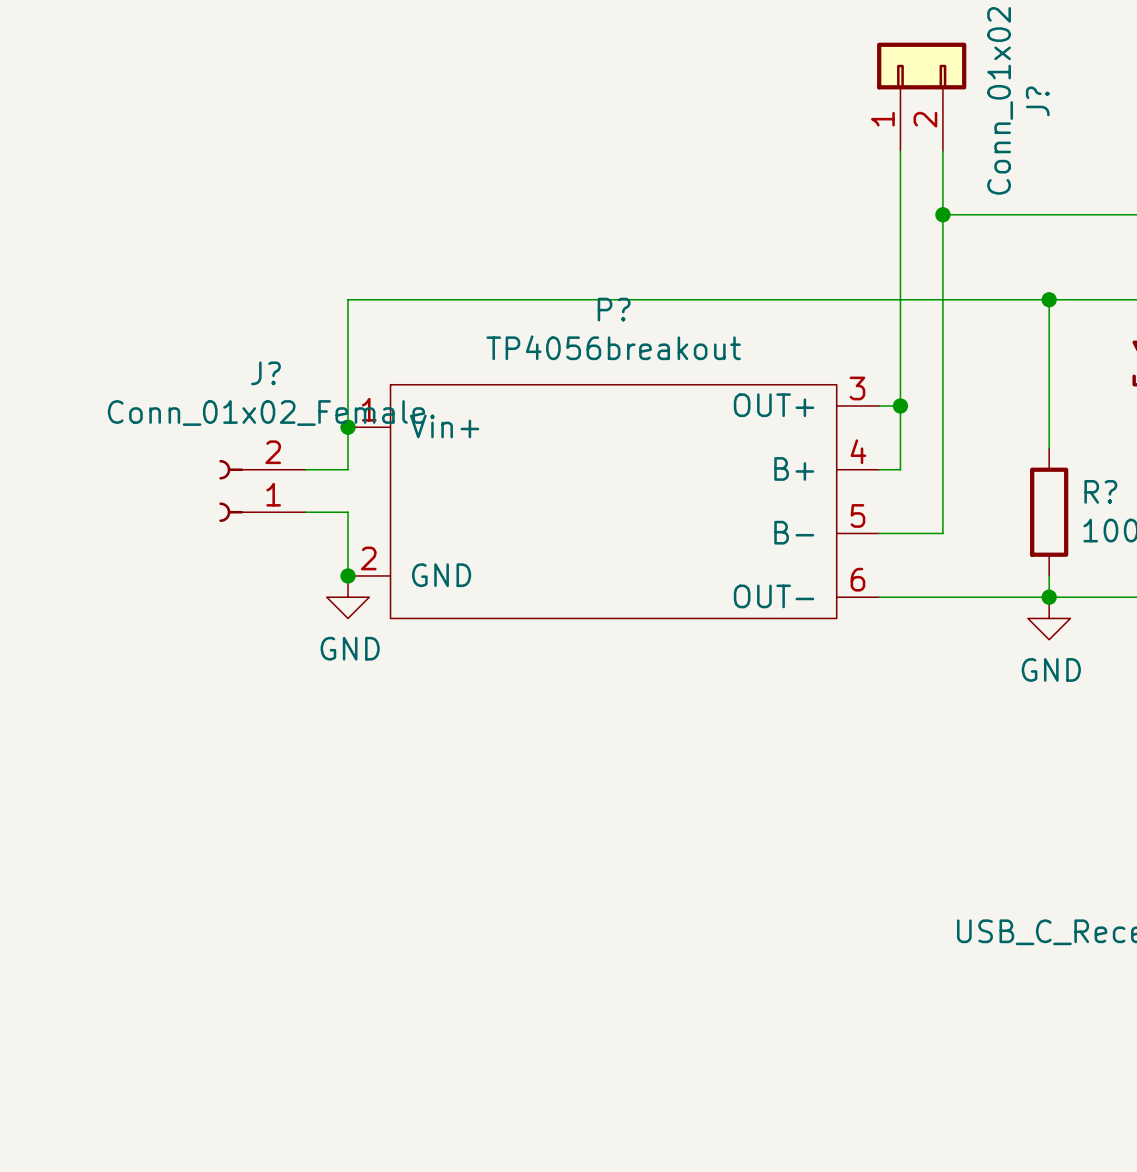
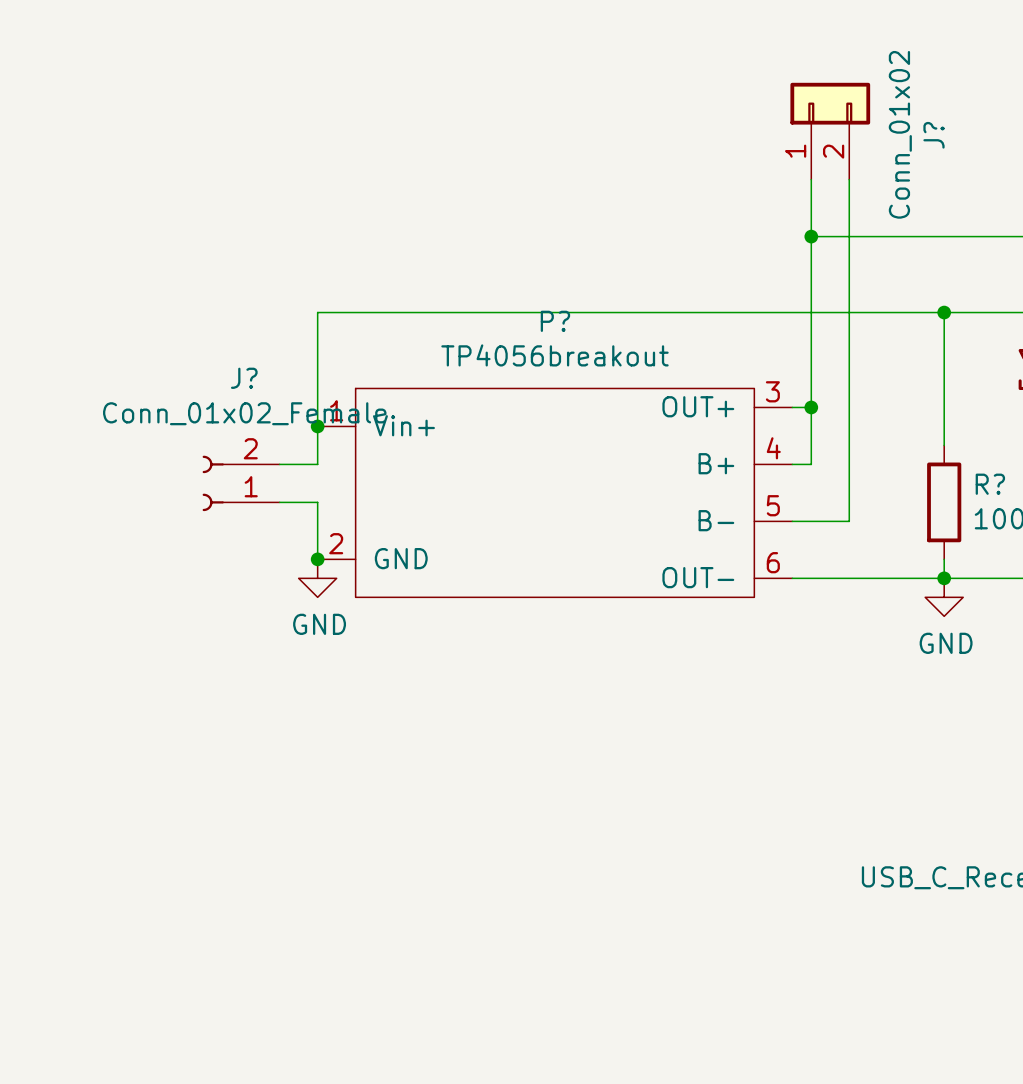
wire: none -> (811, 236) (849, 236)
junction position: (942, 214) -> (811, 236)

